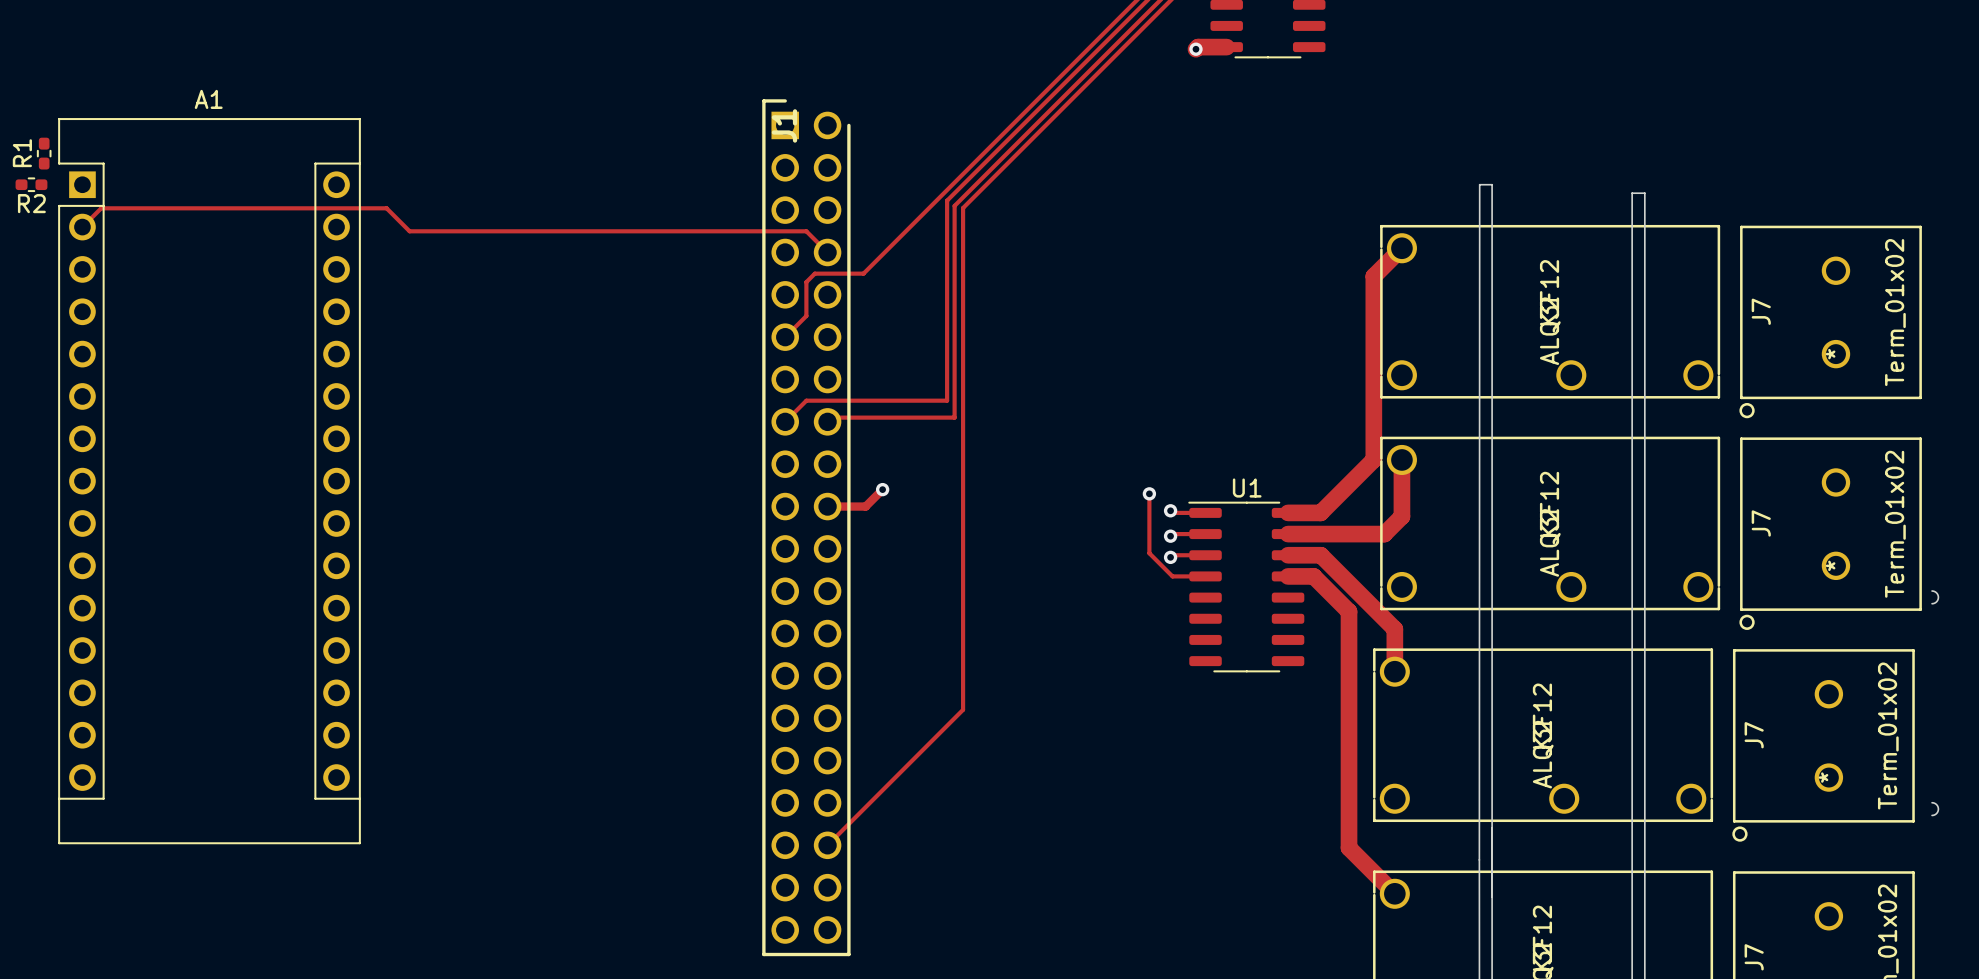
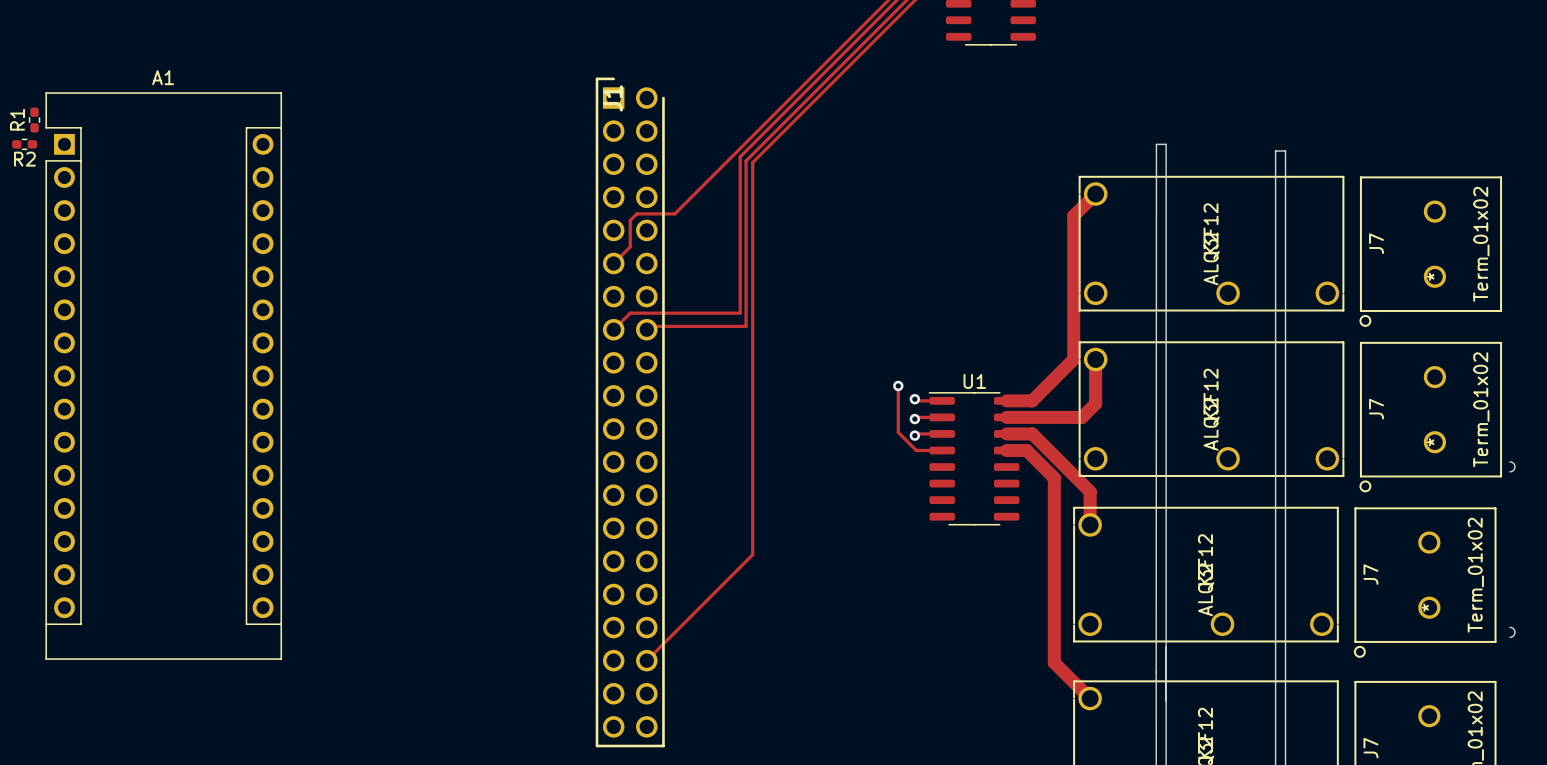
track: (1226, 47) (1198, 47) (1195, 49) -> none
via: (1195, 49) -> none
track: (82, 227) (101, 208) (386, 208) (409, 231) (806, 231) (827, 252) -> none
track: (882, 489) (865, 506) (827, 506) -> none
via: (882, 489) -> none

